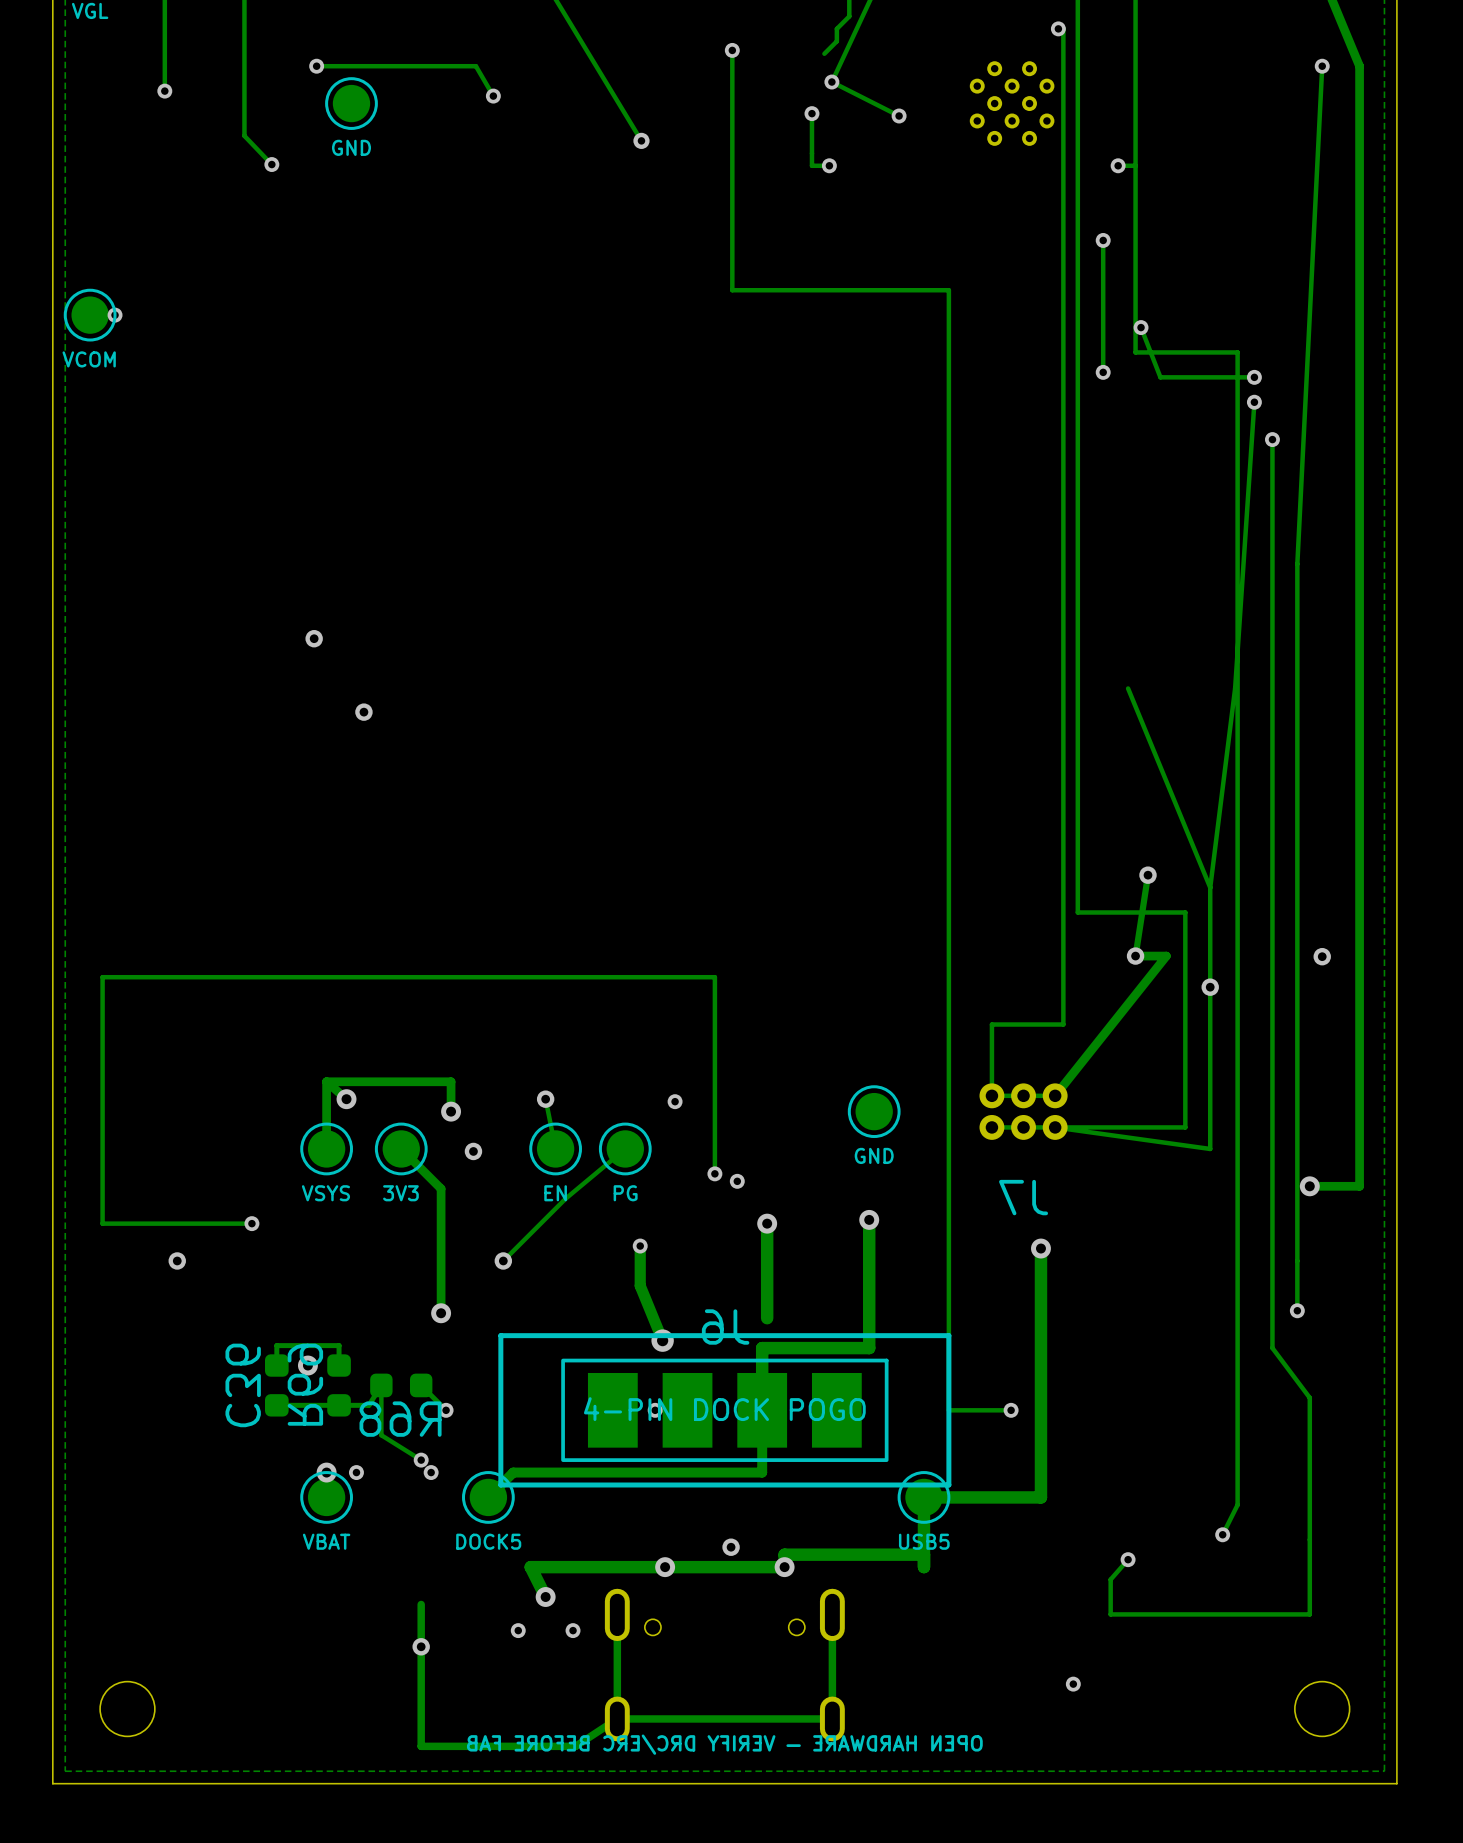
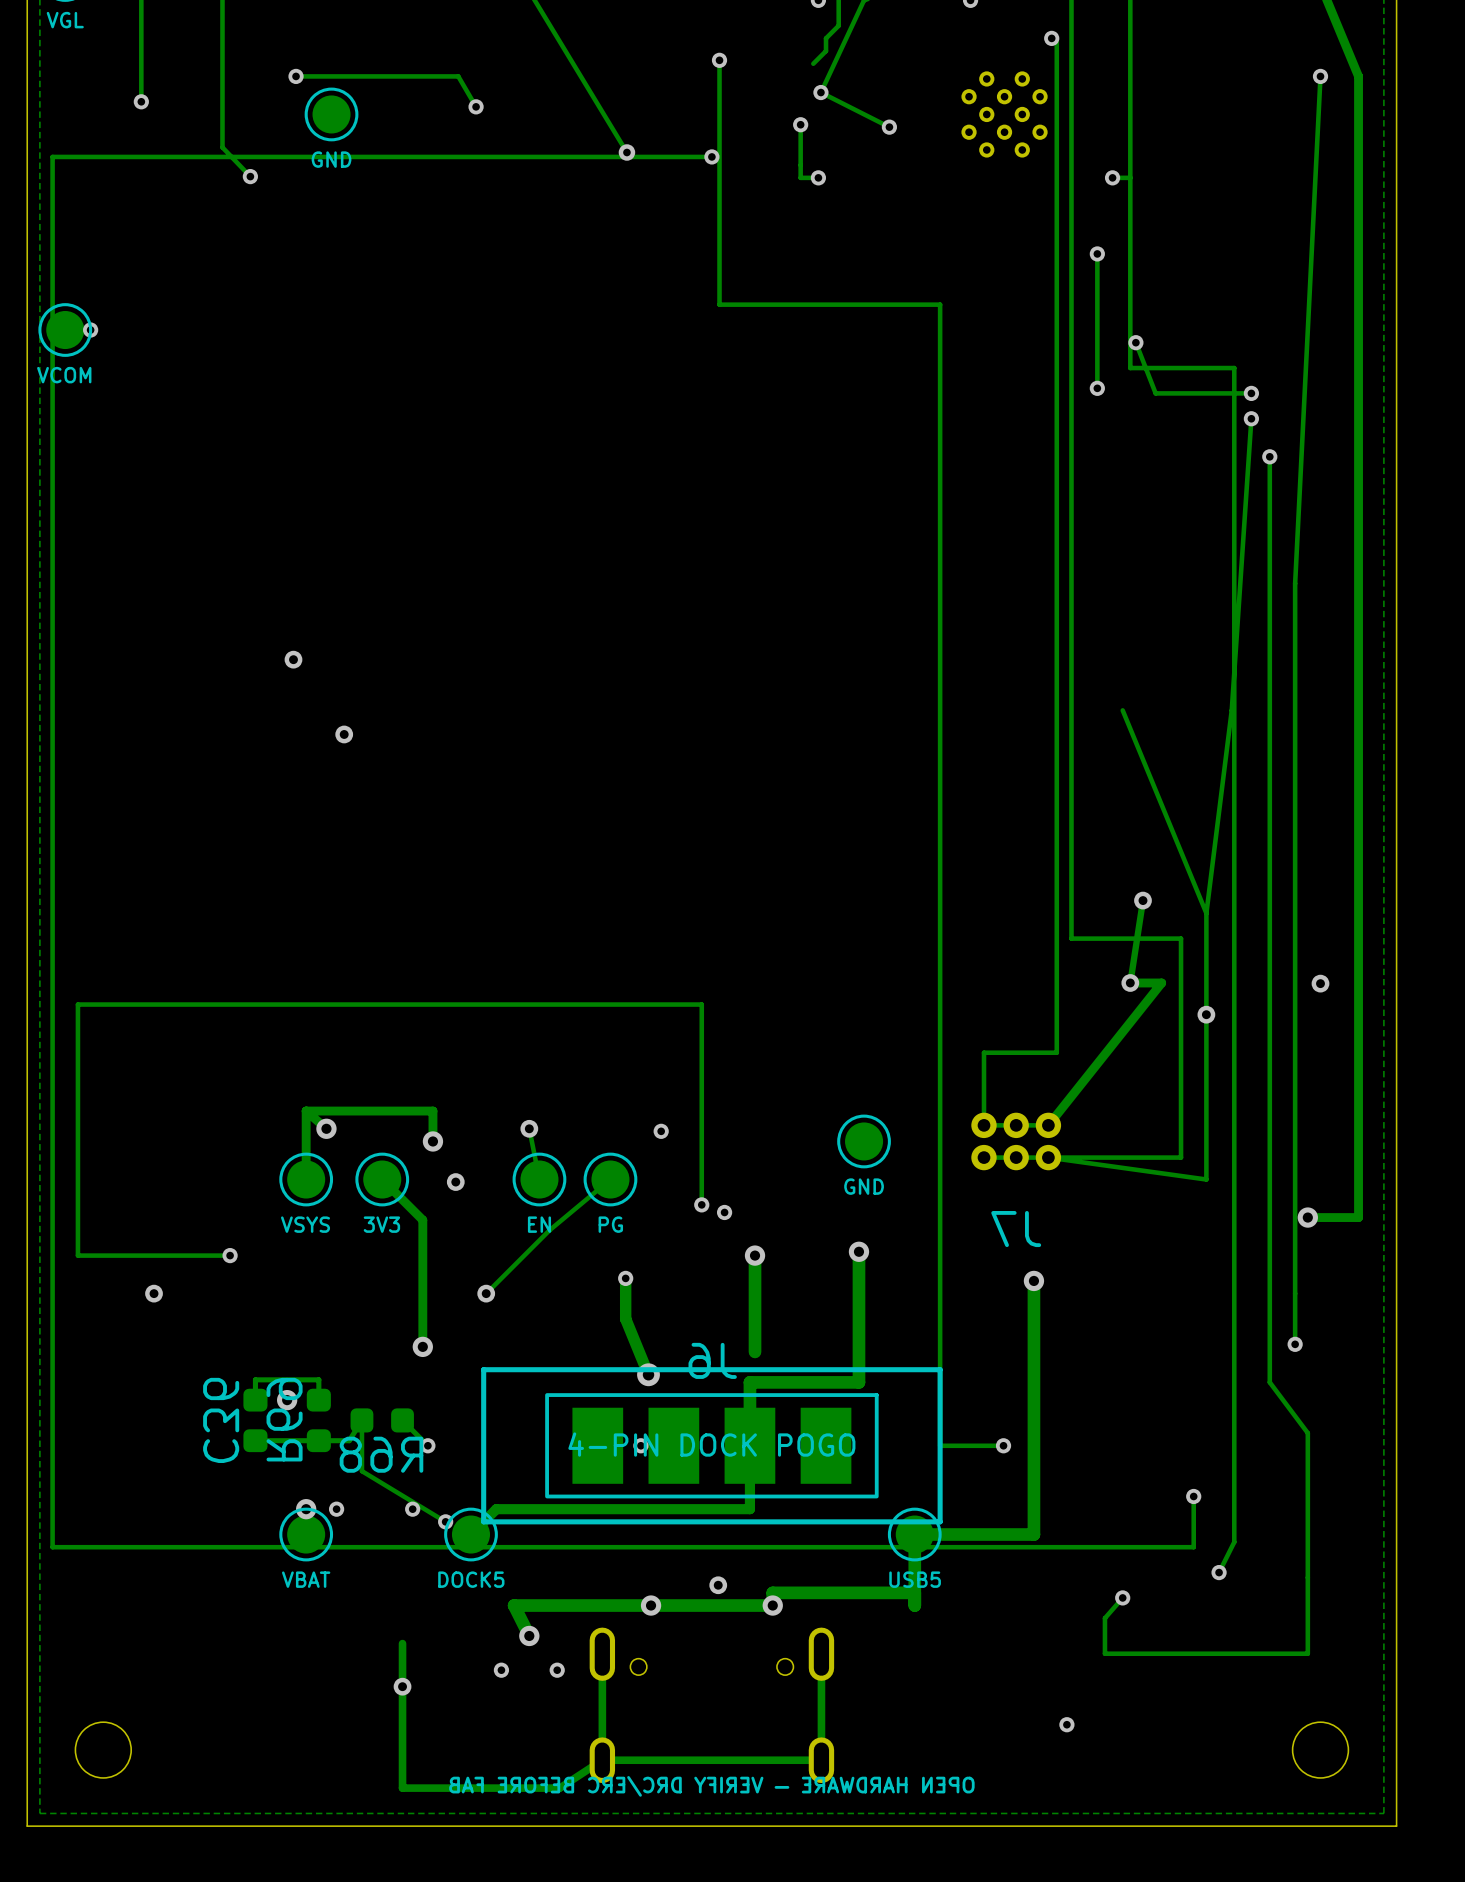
track: none -> (711, 156) (52, 156) (52, 1547) (1193, 1547) (1193, 1496)
via: none -> (711, 156)
track: (381, 1435) (421, 1460) -> (361, 1471) (445, 1521)
via position: (421, 1460) -> (445, 1521)
via: none -> (1193, 1496)

